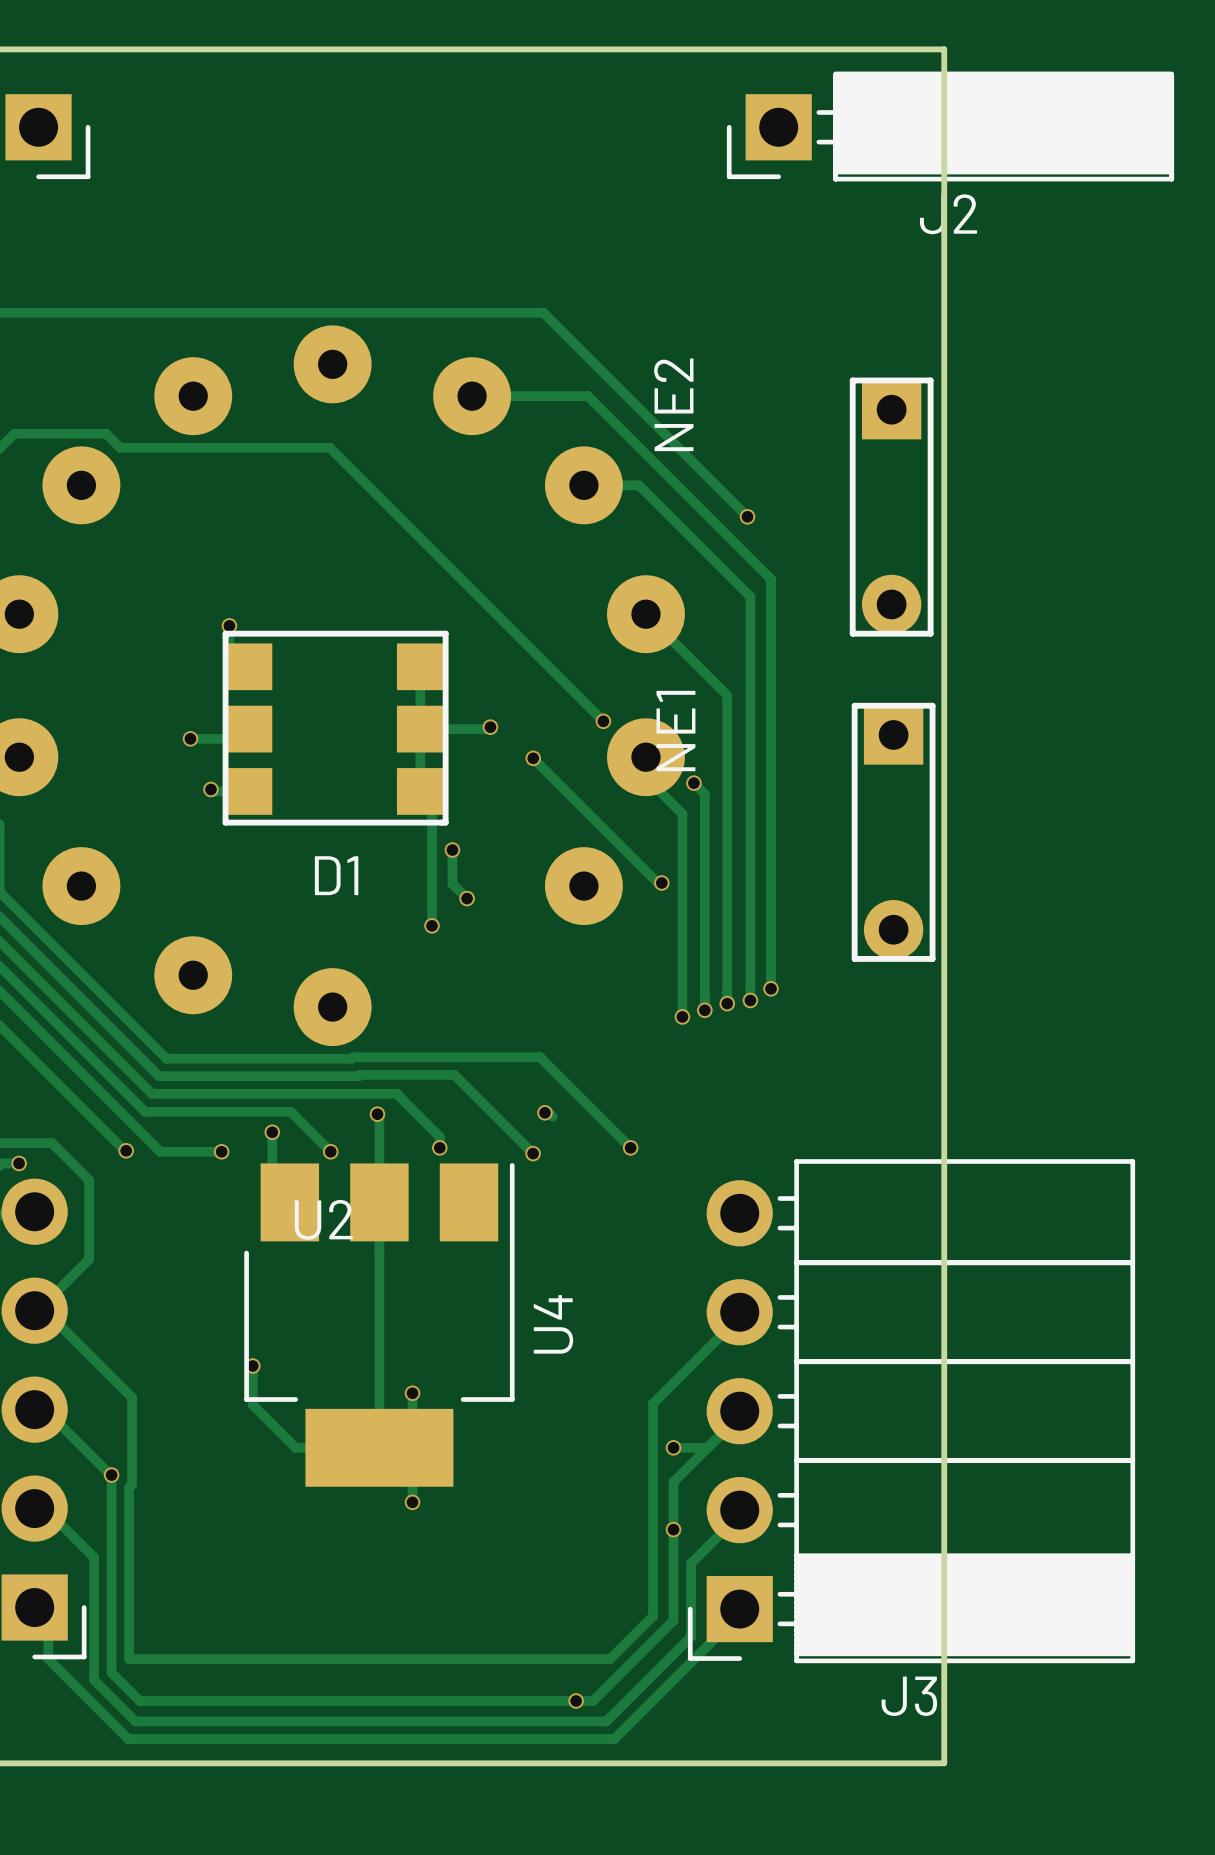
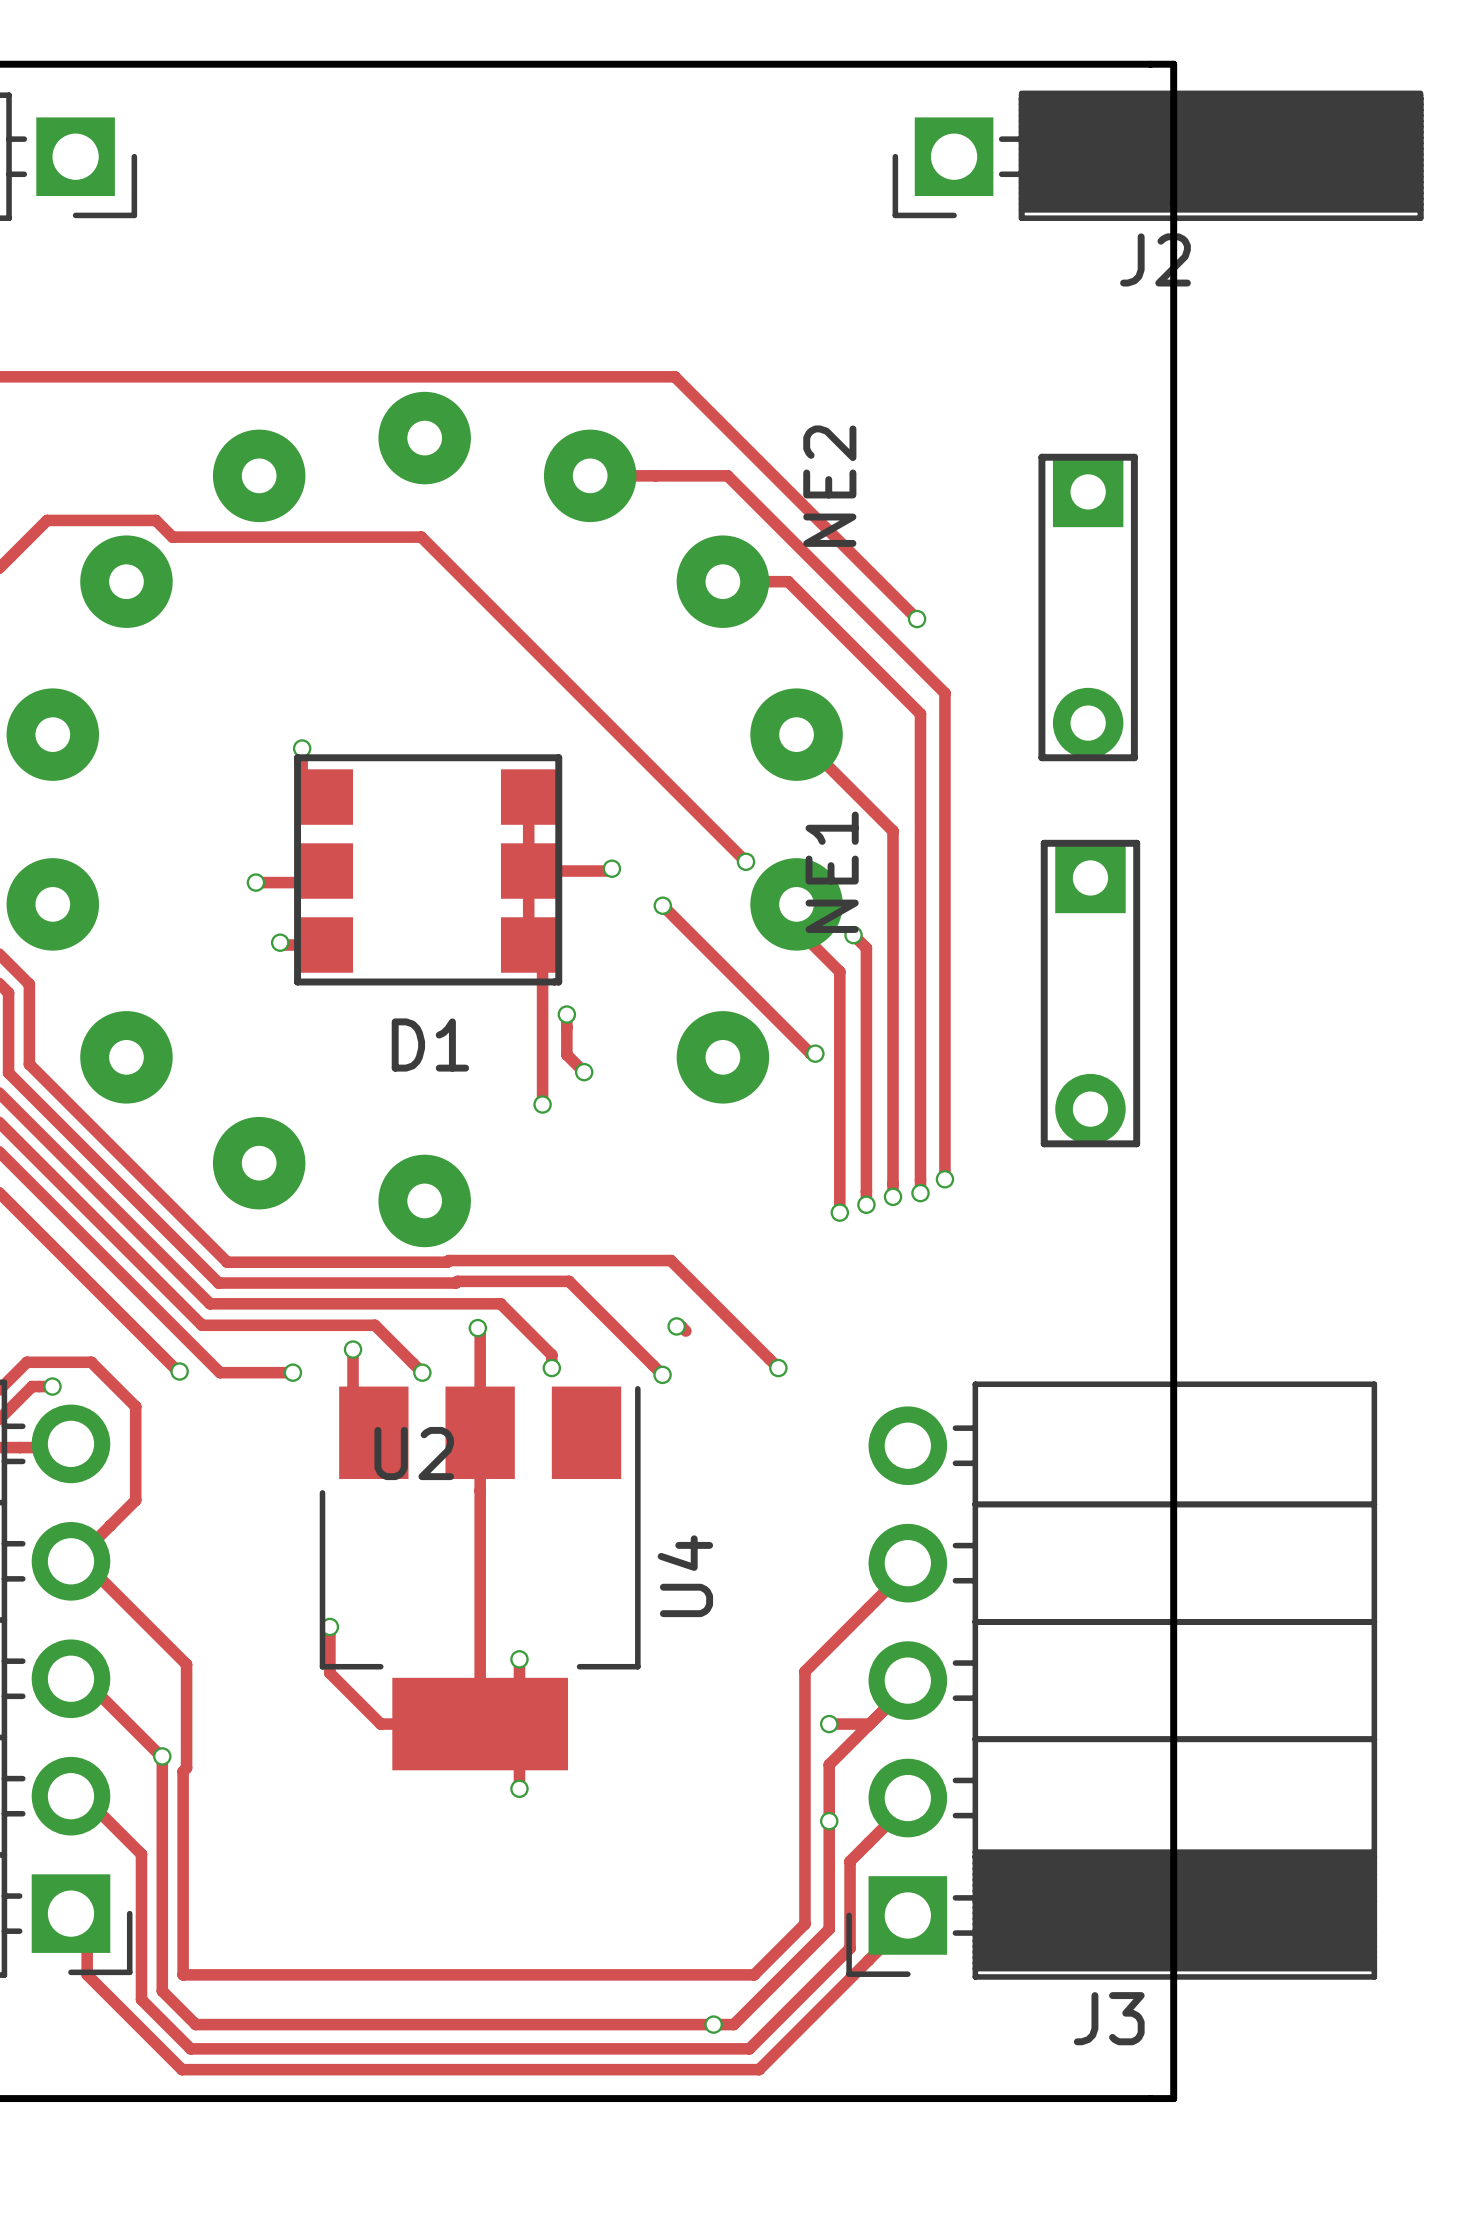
board edge: (944, 49) (944, 1763) -> (1150, 64) (1173, 64) (1173, 2098) (1150, 2098)

